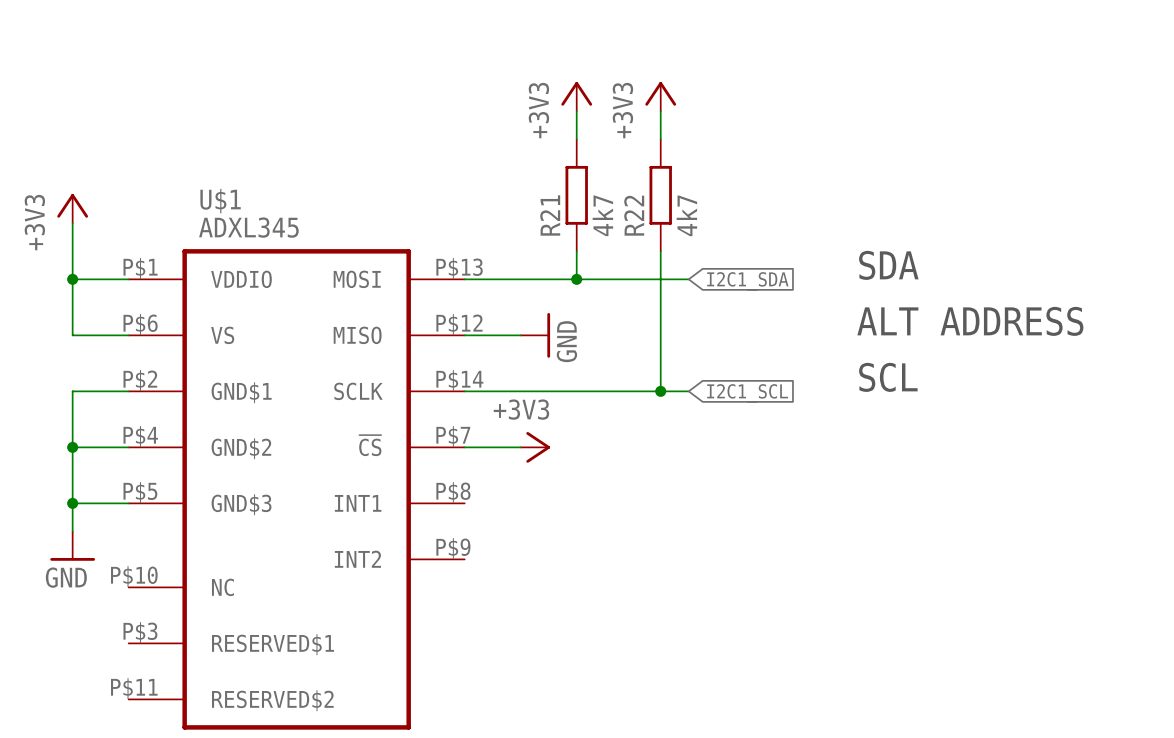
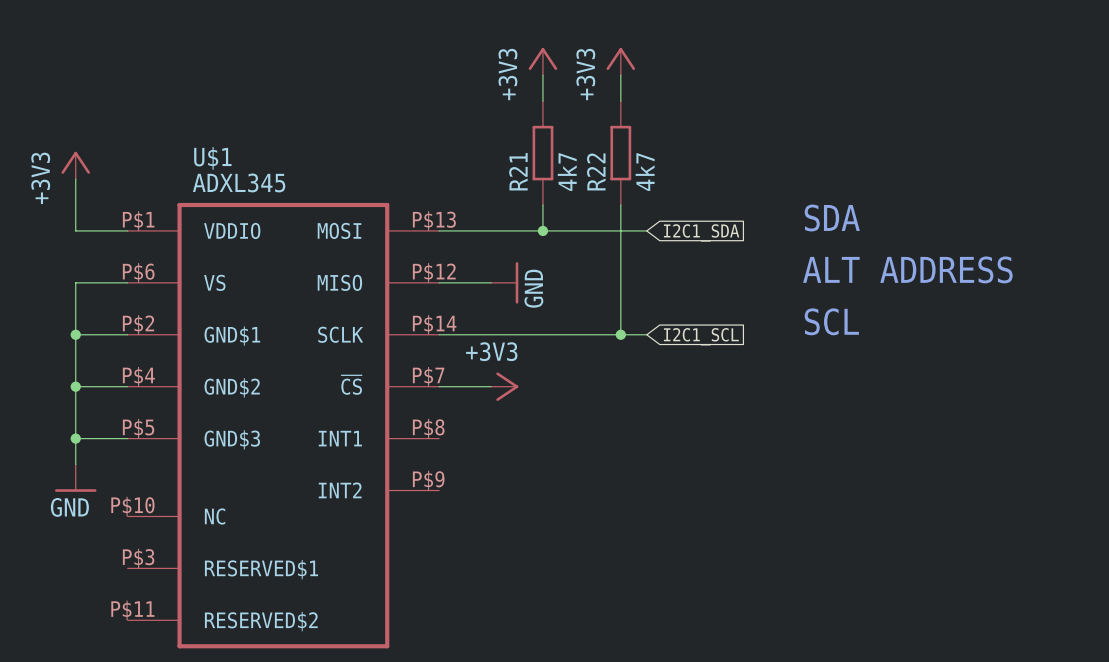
wire: (72, 279) (72, 335) -> (75, 334) (75, 282)
junction: (72, 279) -> none
junction: none -> (75, 334)

